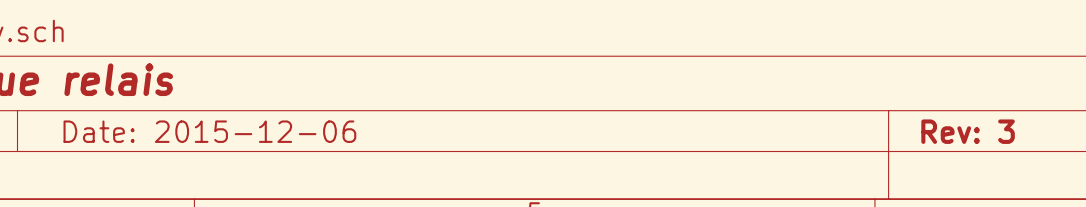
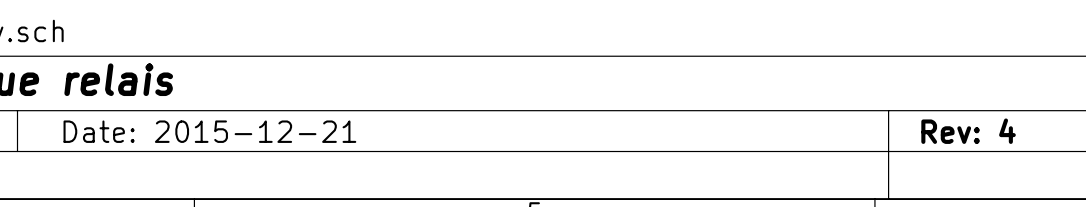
title block: Date: 2015-12-06 (209, 131) -> Date: 2015-12-21 (209, 131)
title block: Rev: 3 (968, 131) -> Rev: 4 (968, 131)

